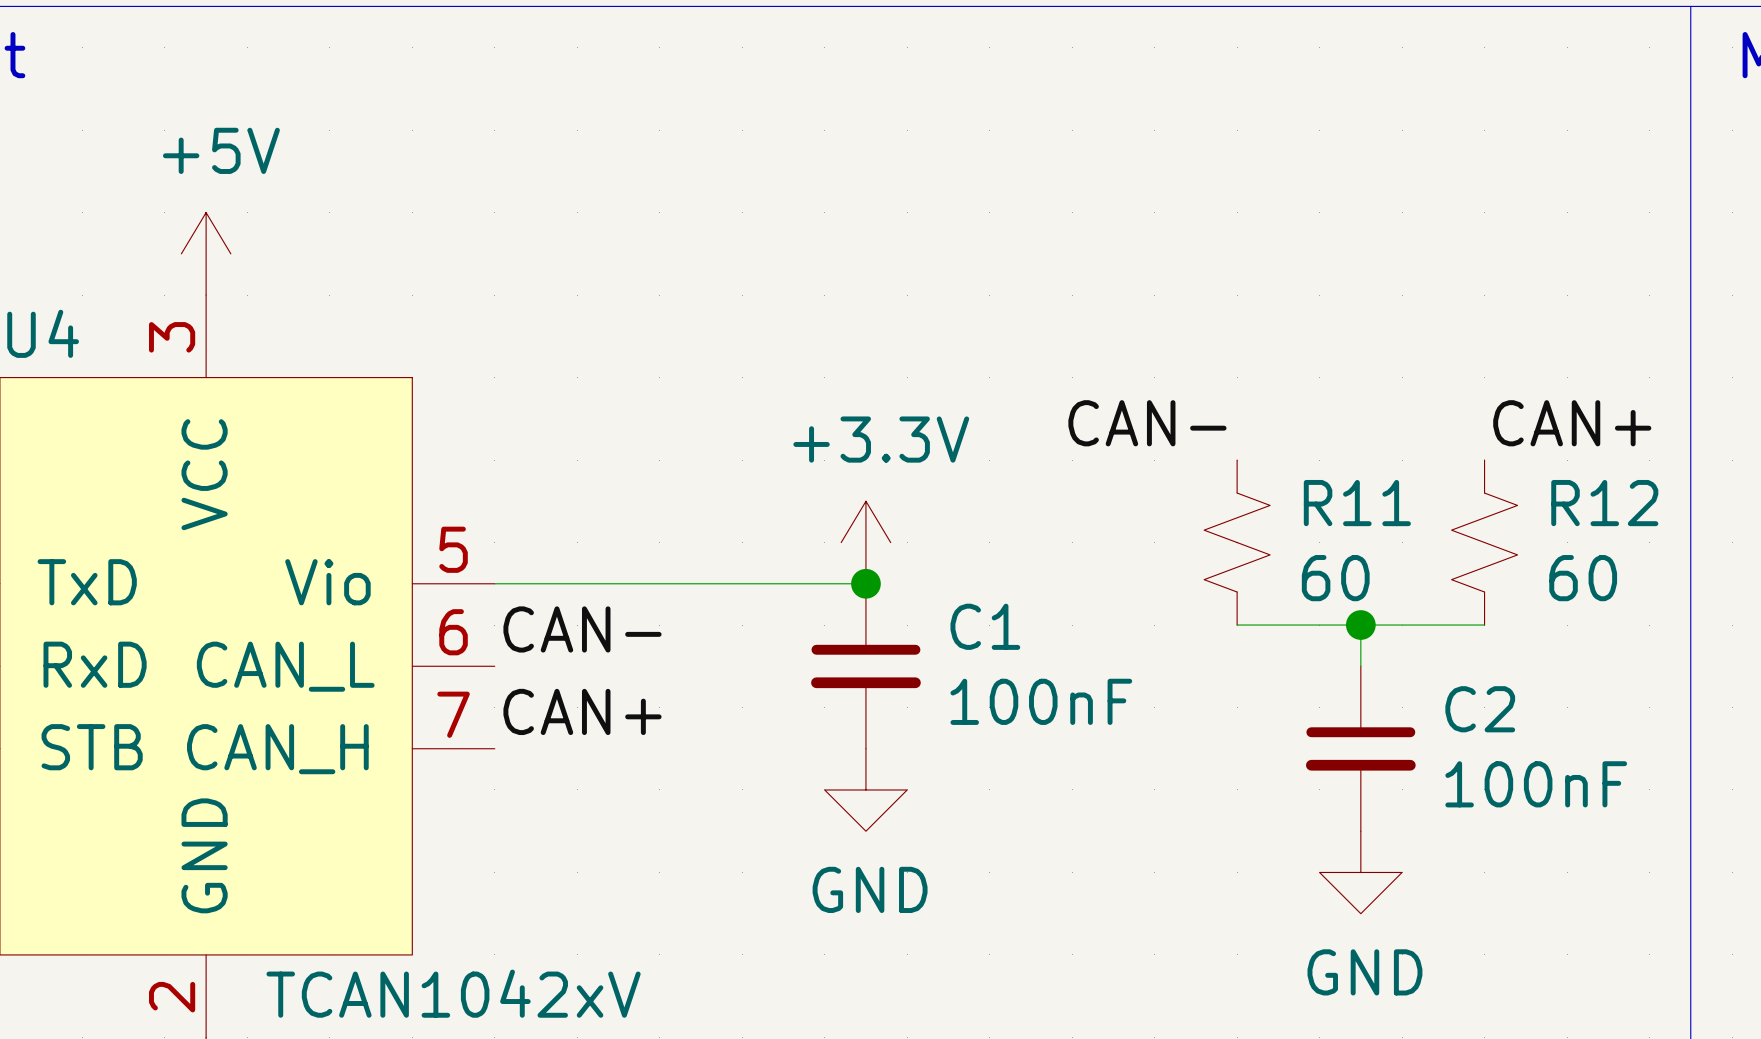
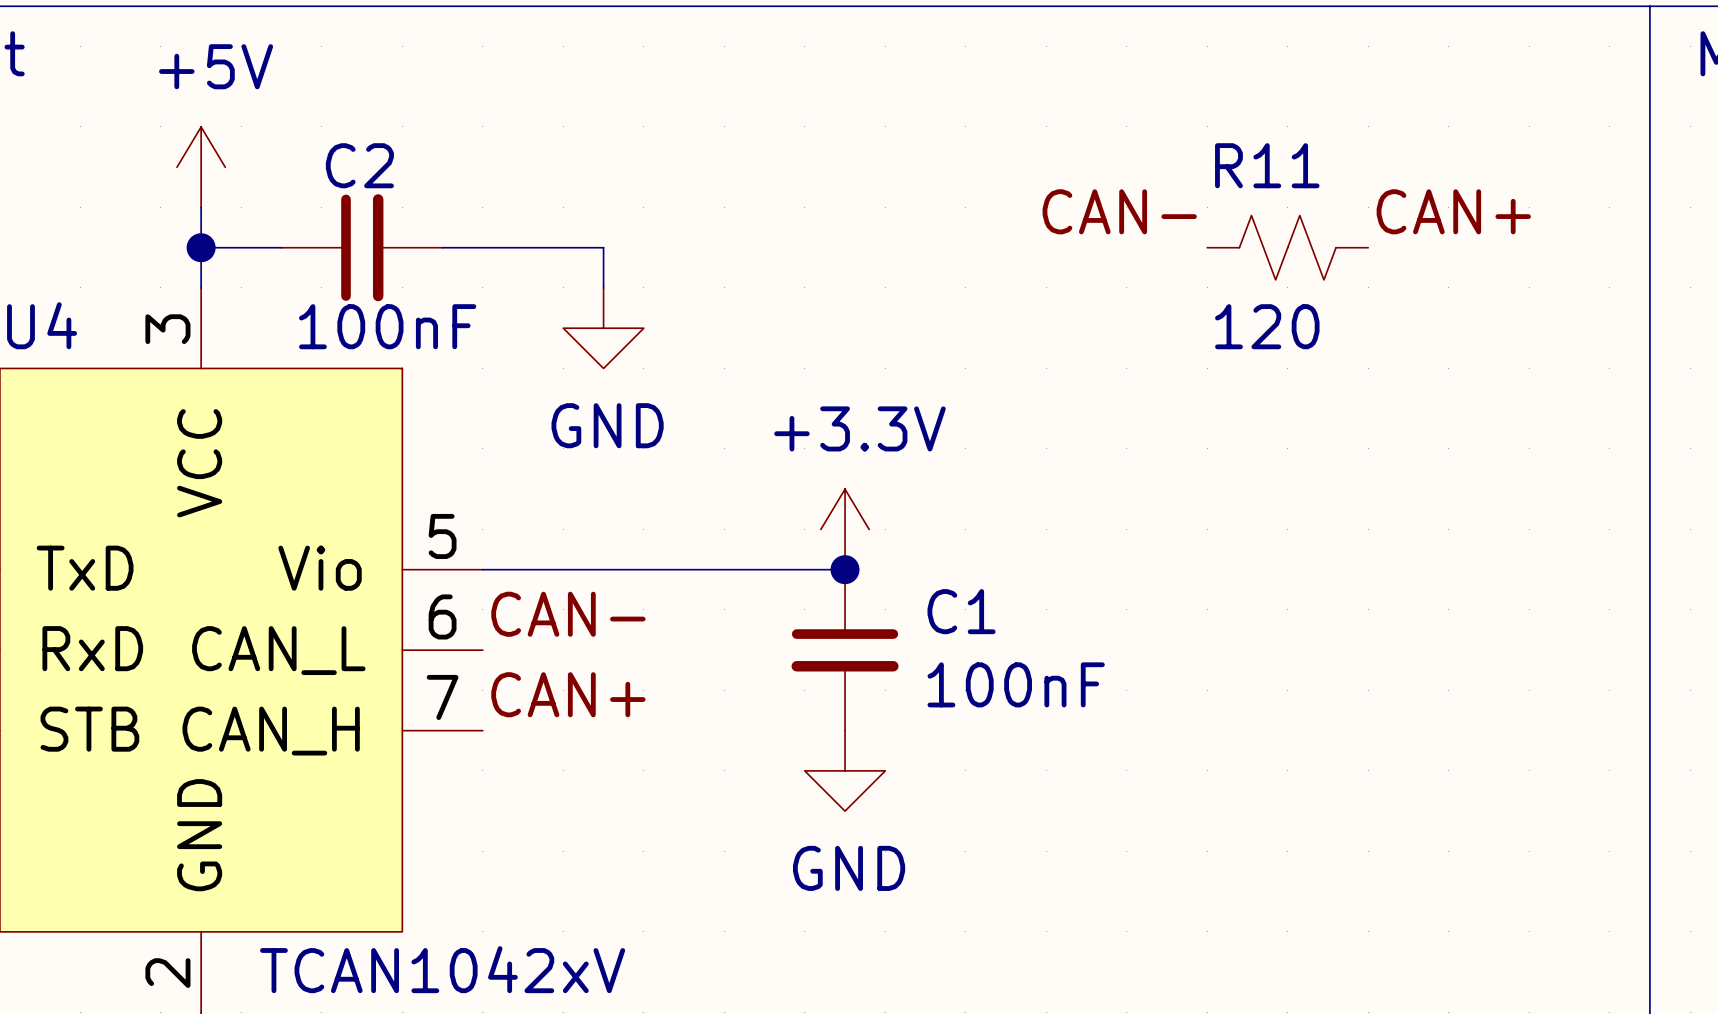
wire: none -> (201, 247) (281, 247)
junction: none -> (201, 247)
power symbol position: +5V (206, 253) -> +5V (201, 167)
wire: none -> (442, 247) (603, 247) (603, 287)
power symbol: none -> GND (603, 328)
label position: CAN- (1147, 423) -> CAN- (1119, 211)
label position: CAN+ (1572, 423) -> CAN+ (1453, 211)
R11 name position: R11 (1357, 503) -> R11 (1267, 165)
R11 rotation: 0° (1237, 542) -> 90° clockwise (1287, 247)
R11 position: (1237, 542) -> (1287, 247)
R12: 60 (1484, 542) -> none
R11 value: 60 (1335, 578) -> 120 (1267, 326)
wire: (1237, 625) (1484, 625) -> none
wire: (1360, 625) (1360, 666) -> none
junction: (1360, 625) -> none
C2 rotation: 0° (1360, 748) -> 90° counterclockwise (362, 247)
C2 position: (1360, 748) -> (362, 247)
C2 value position: 100nF (1536, 784) -> 100nF (387, 326)
power symbol: GND (1360, 872) -> none

